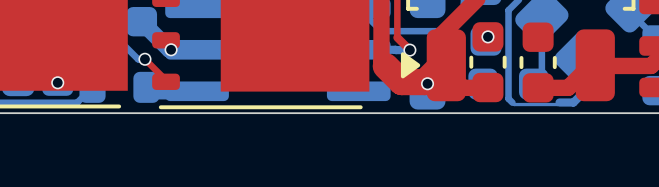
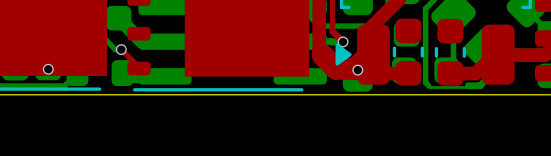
via: (487, 36) -> none
via: (171, 49) -> none

